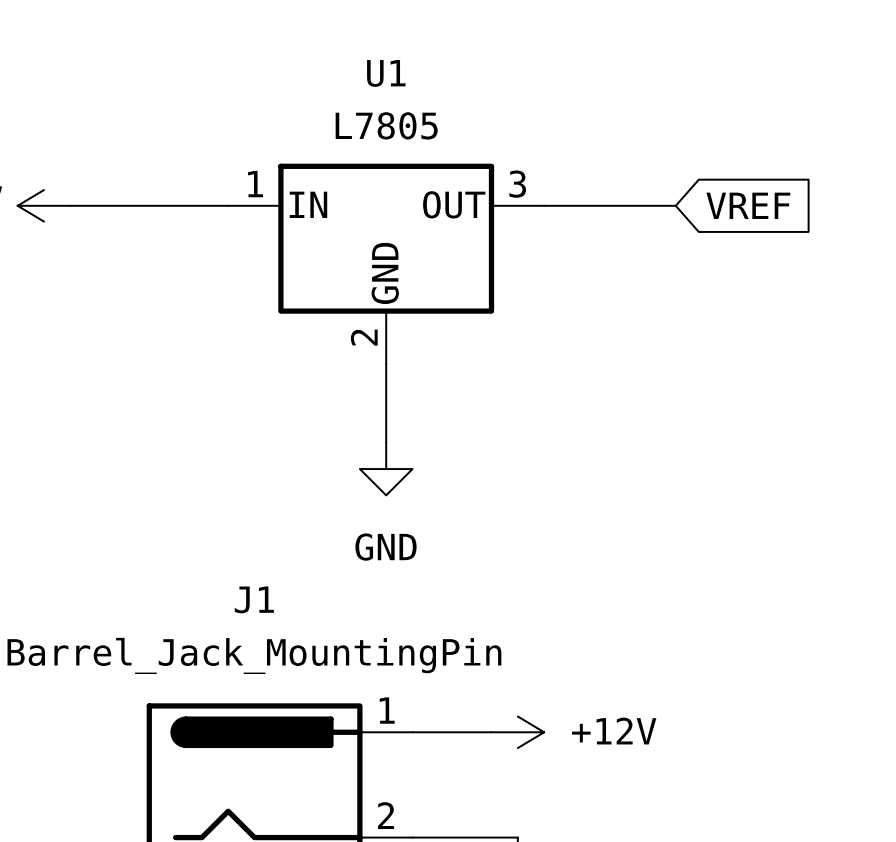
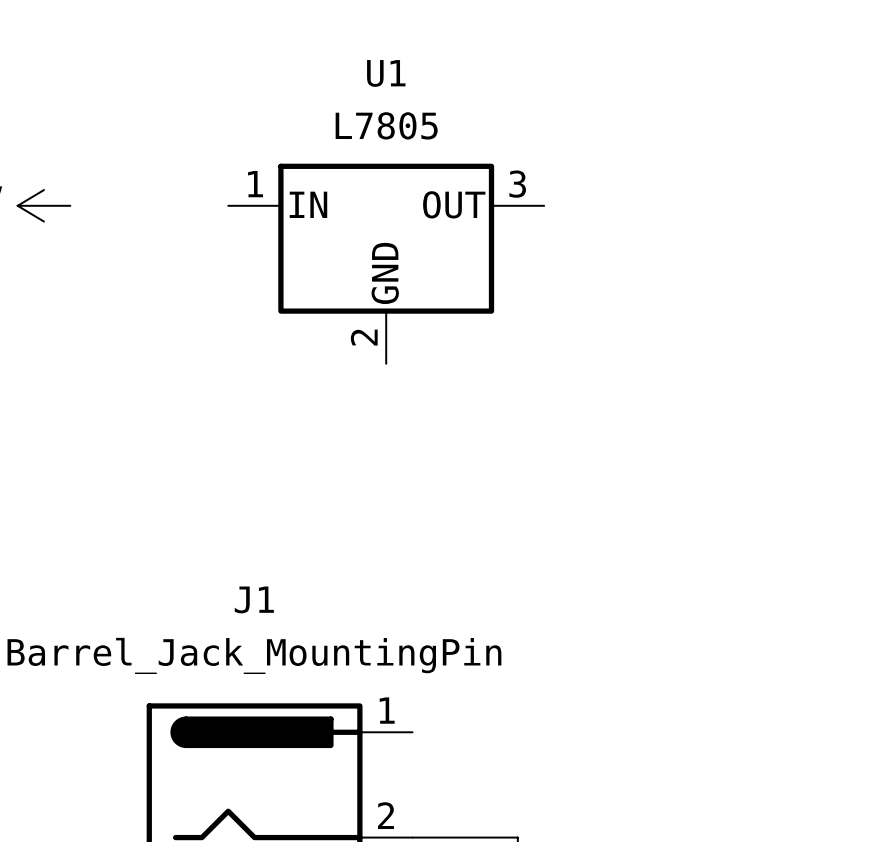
wire: (70, 205) (228, 205) -> none
wire: (544, 205) (675, 205) -> none
global label: VREF (748, 205) -> none
wire: (386, 363) (386, 442) -> none
power symbol: GND (386, 469) -> none
wire: (412, 732) (491, 732) -> none
power symbol: +12V (517, 732) -> none

